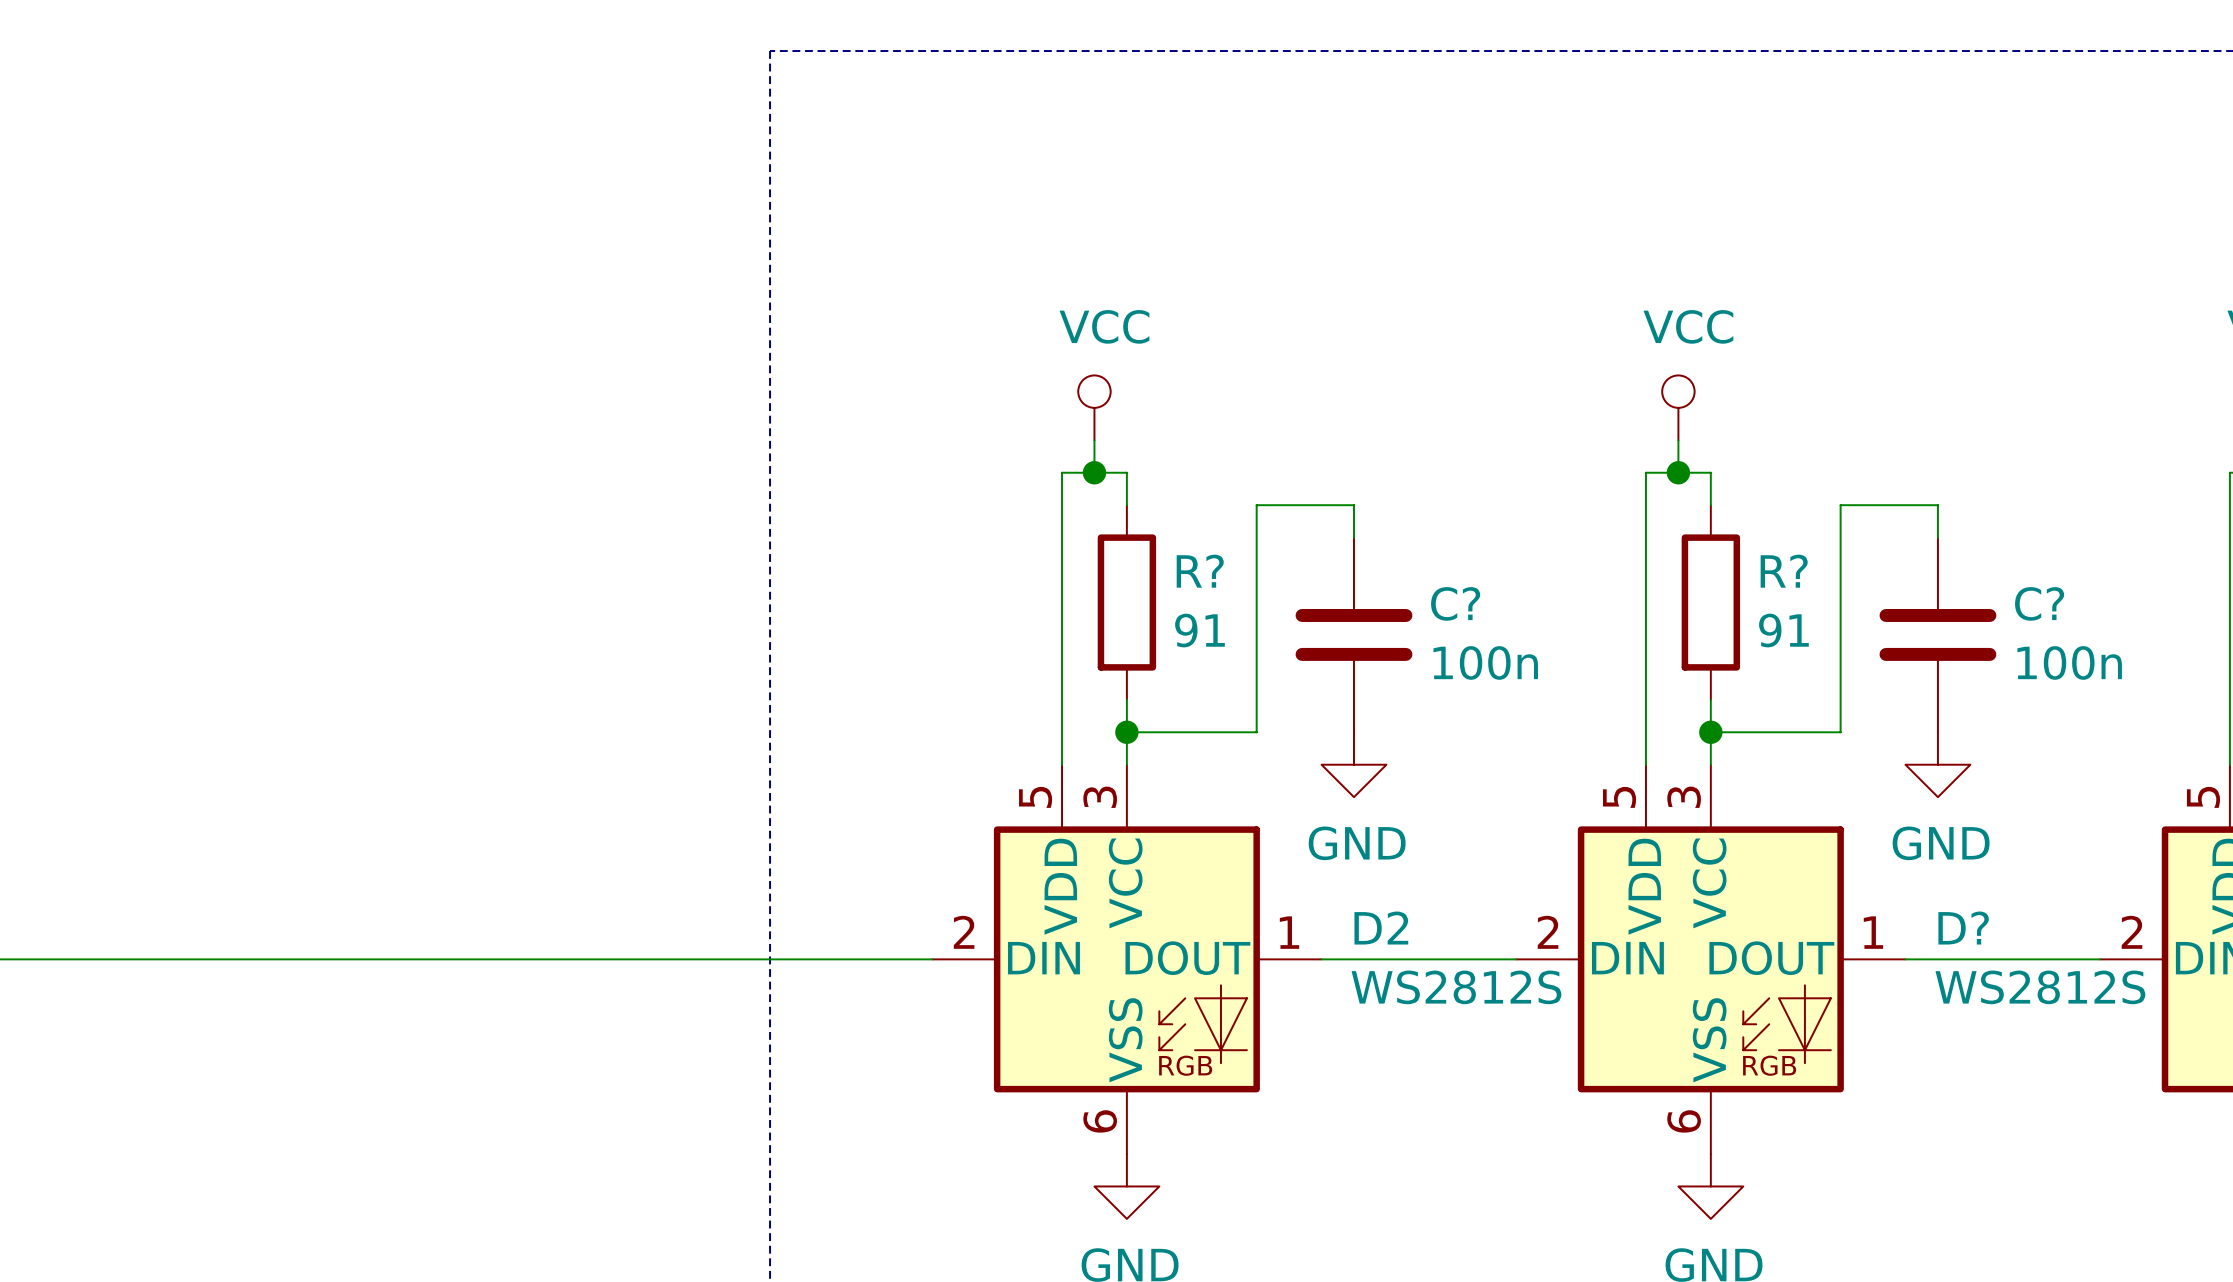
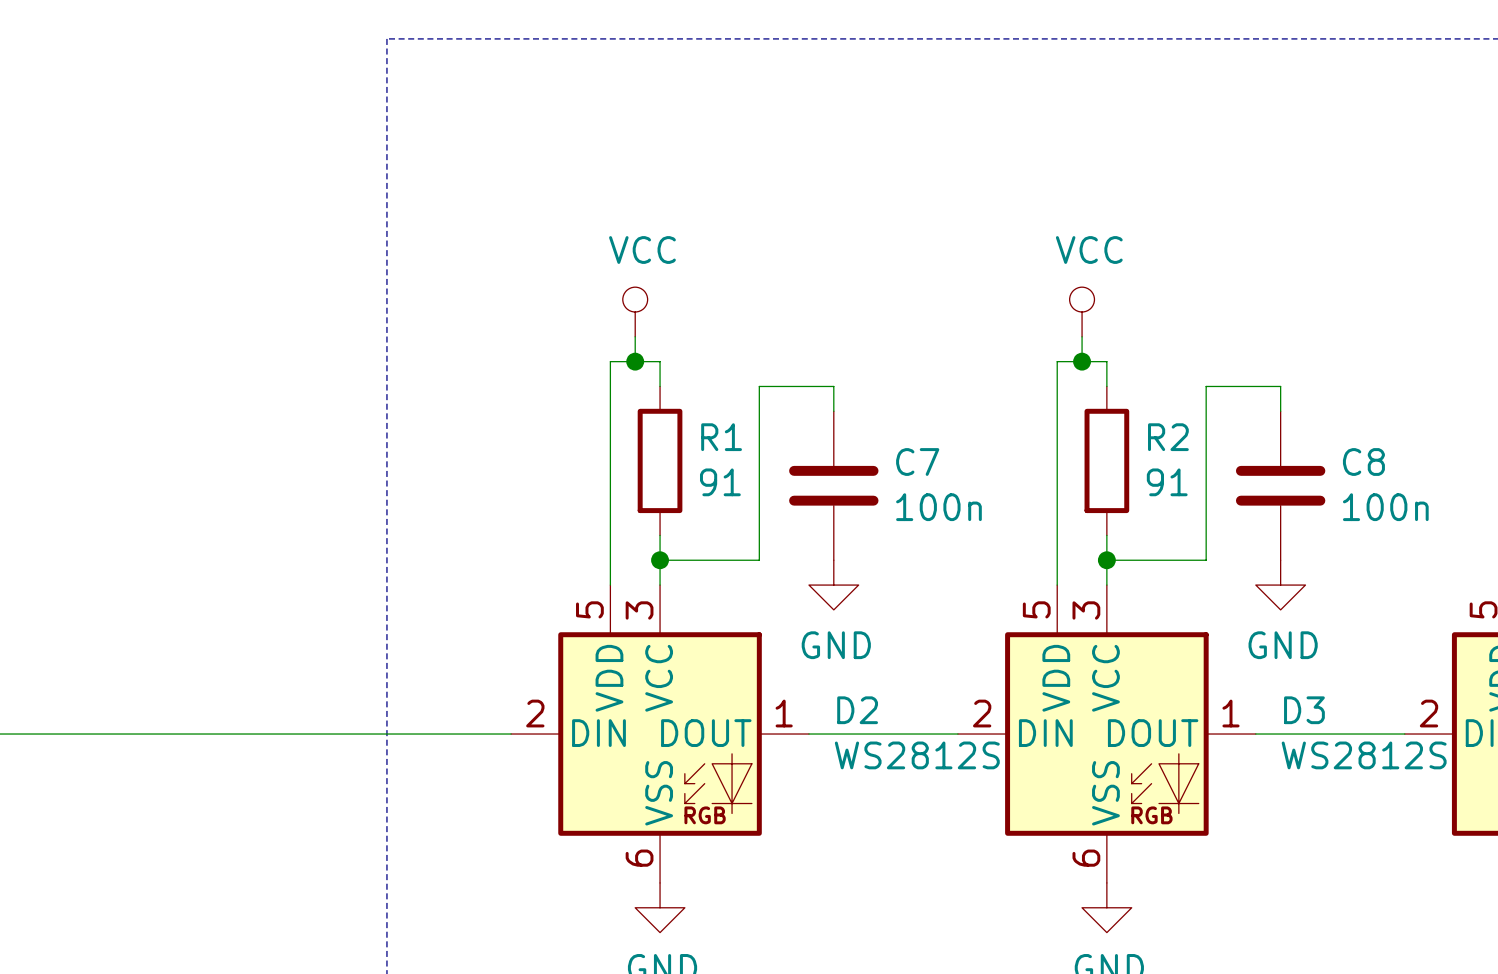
R? name: R? (1200, 571) -> R1 (721, 437)
R? name: R? (1784, 571) -> R2 (1168, 437)
C? name: C? (1455, 603) -> C7 (917, 462)
C? name: C? (2039, 603) -> C8 (1363, 462)
D? name: D? (1963, 928) -> D3 (1304, 710)

